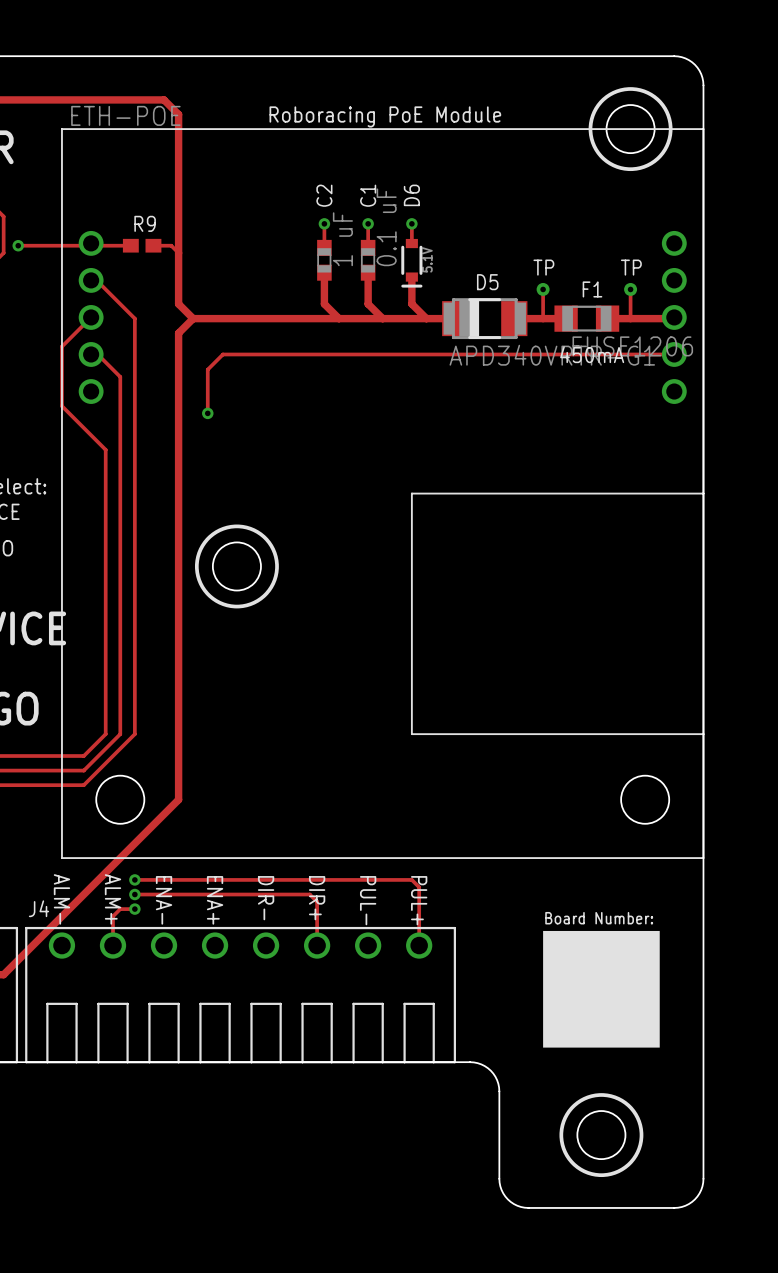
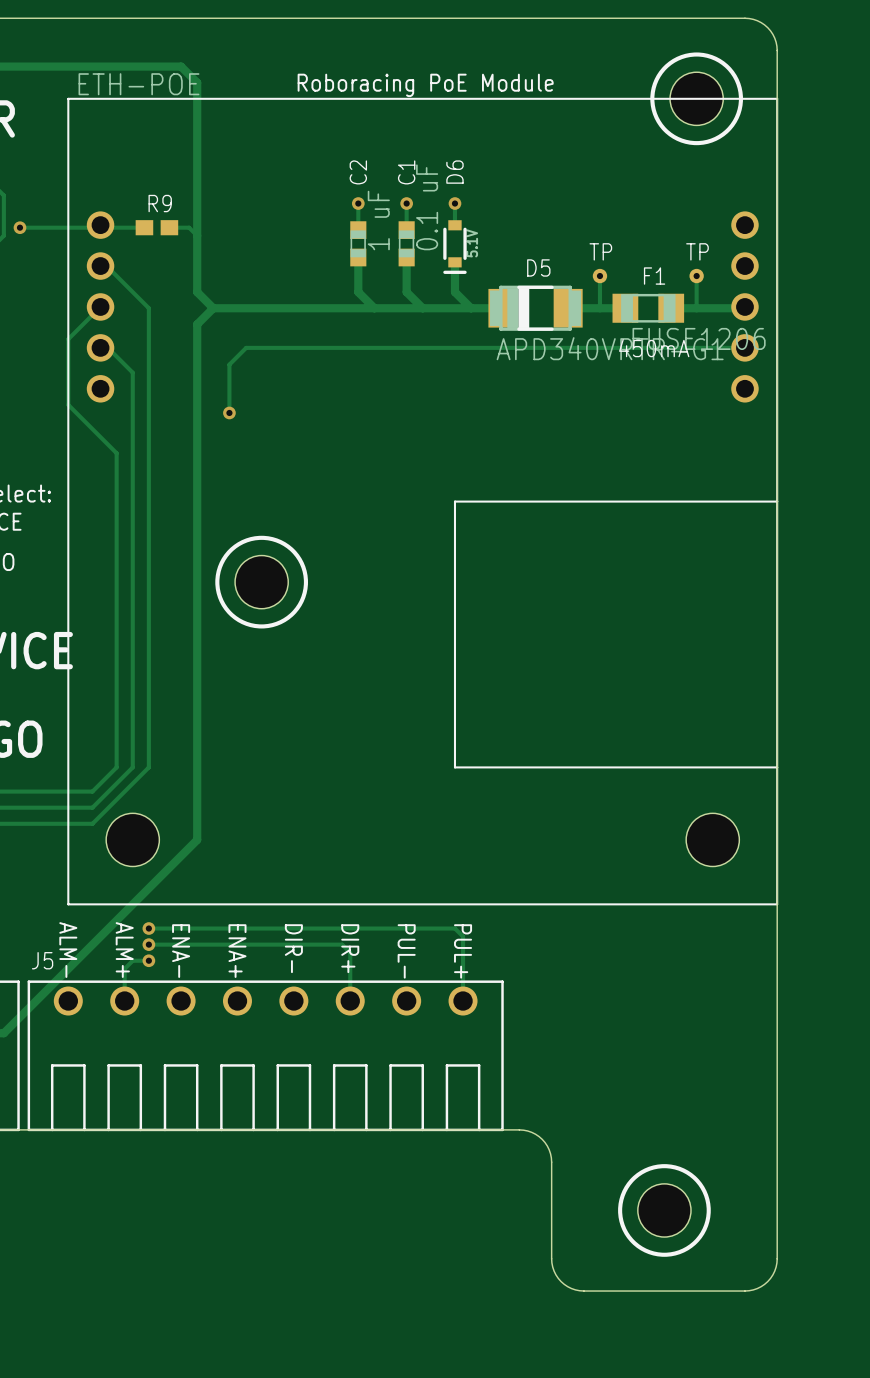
J4 name: J4 (38, 908) -> J5 (42, 960)
text: Board Number: (599, 918) -> none
drawing: [543, 930, 660, 1048] -> none

